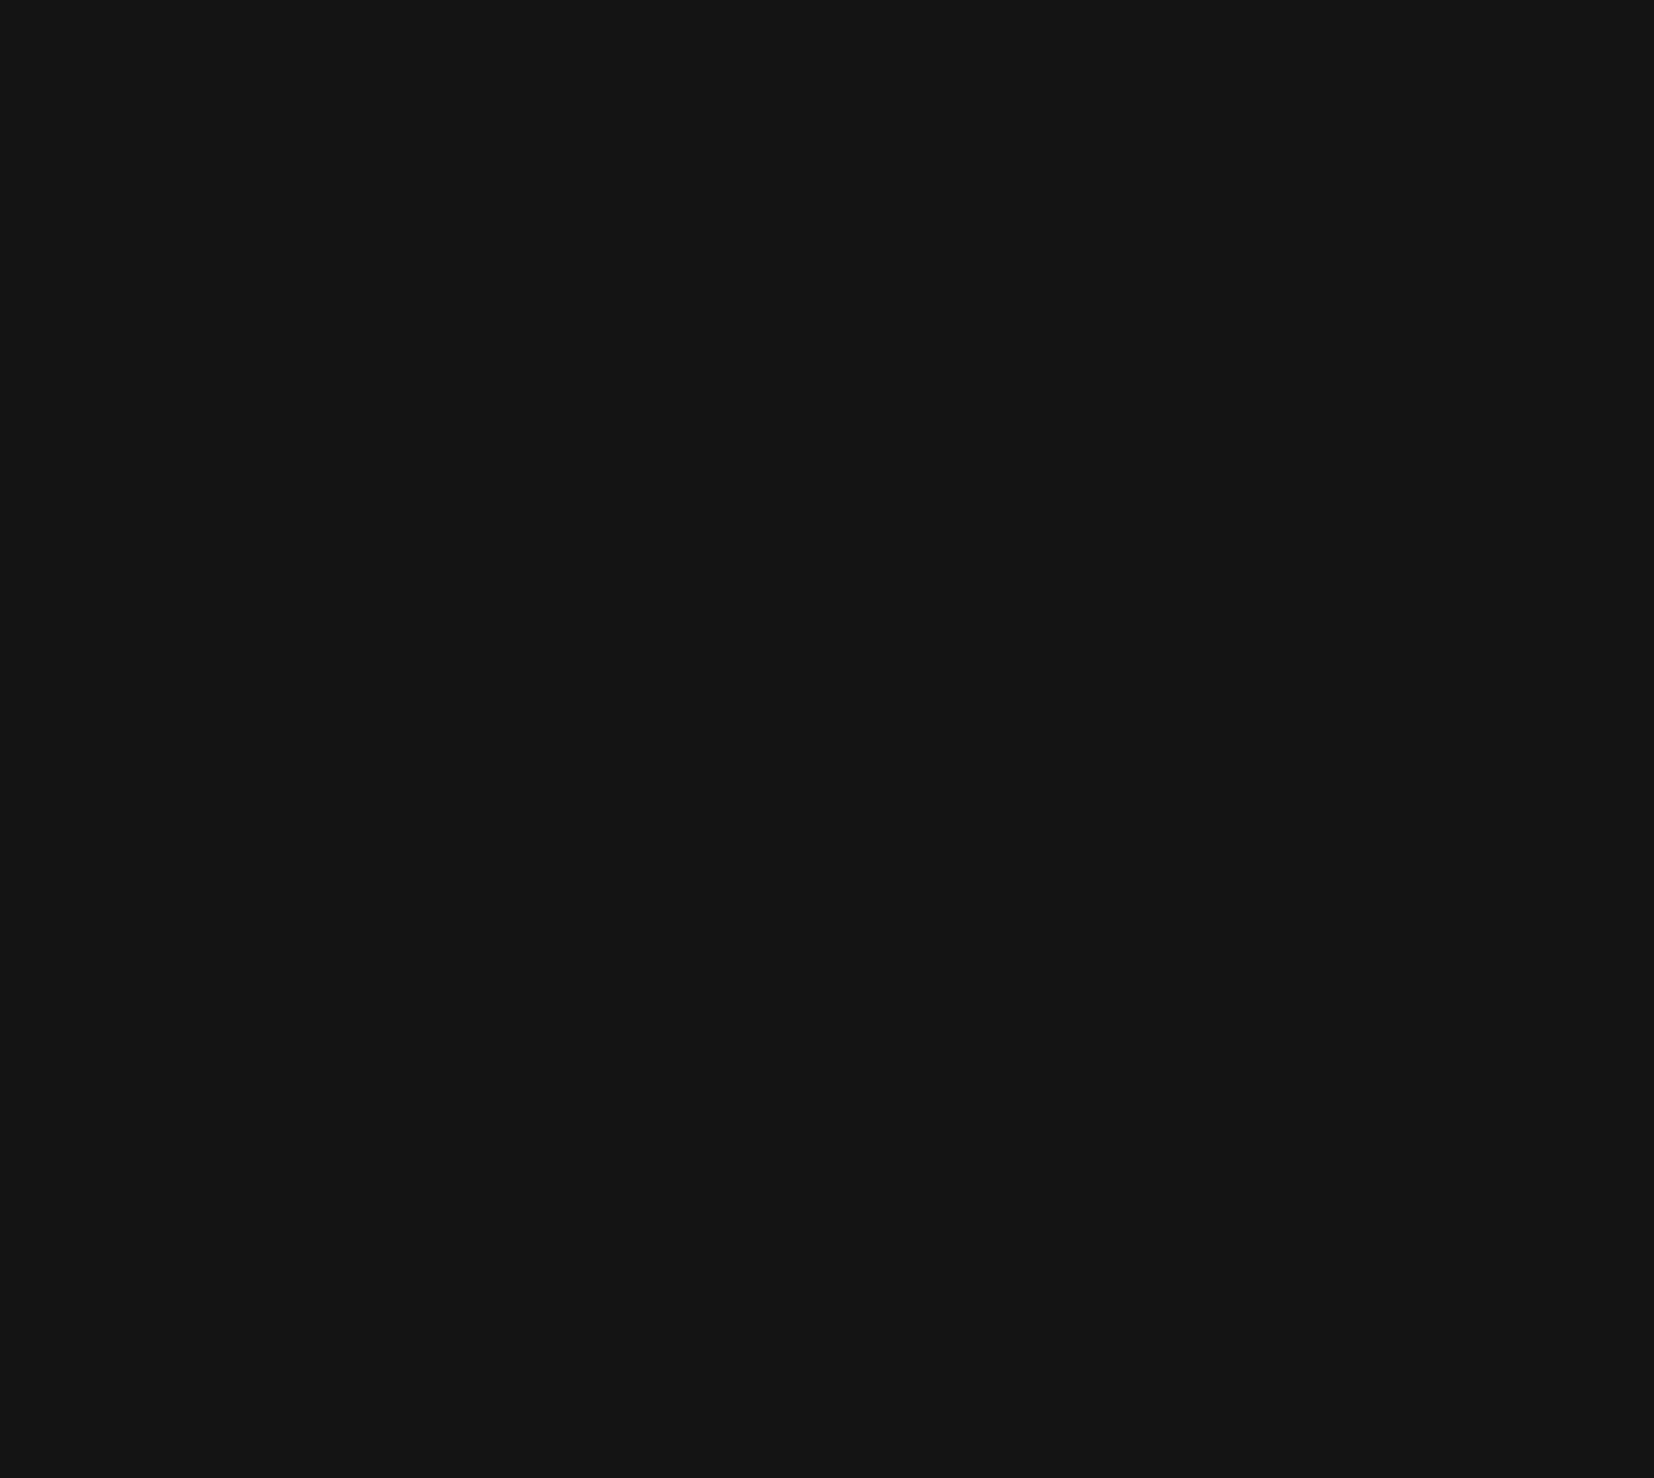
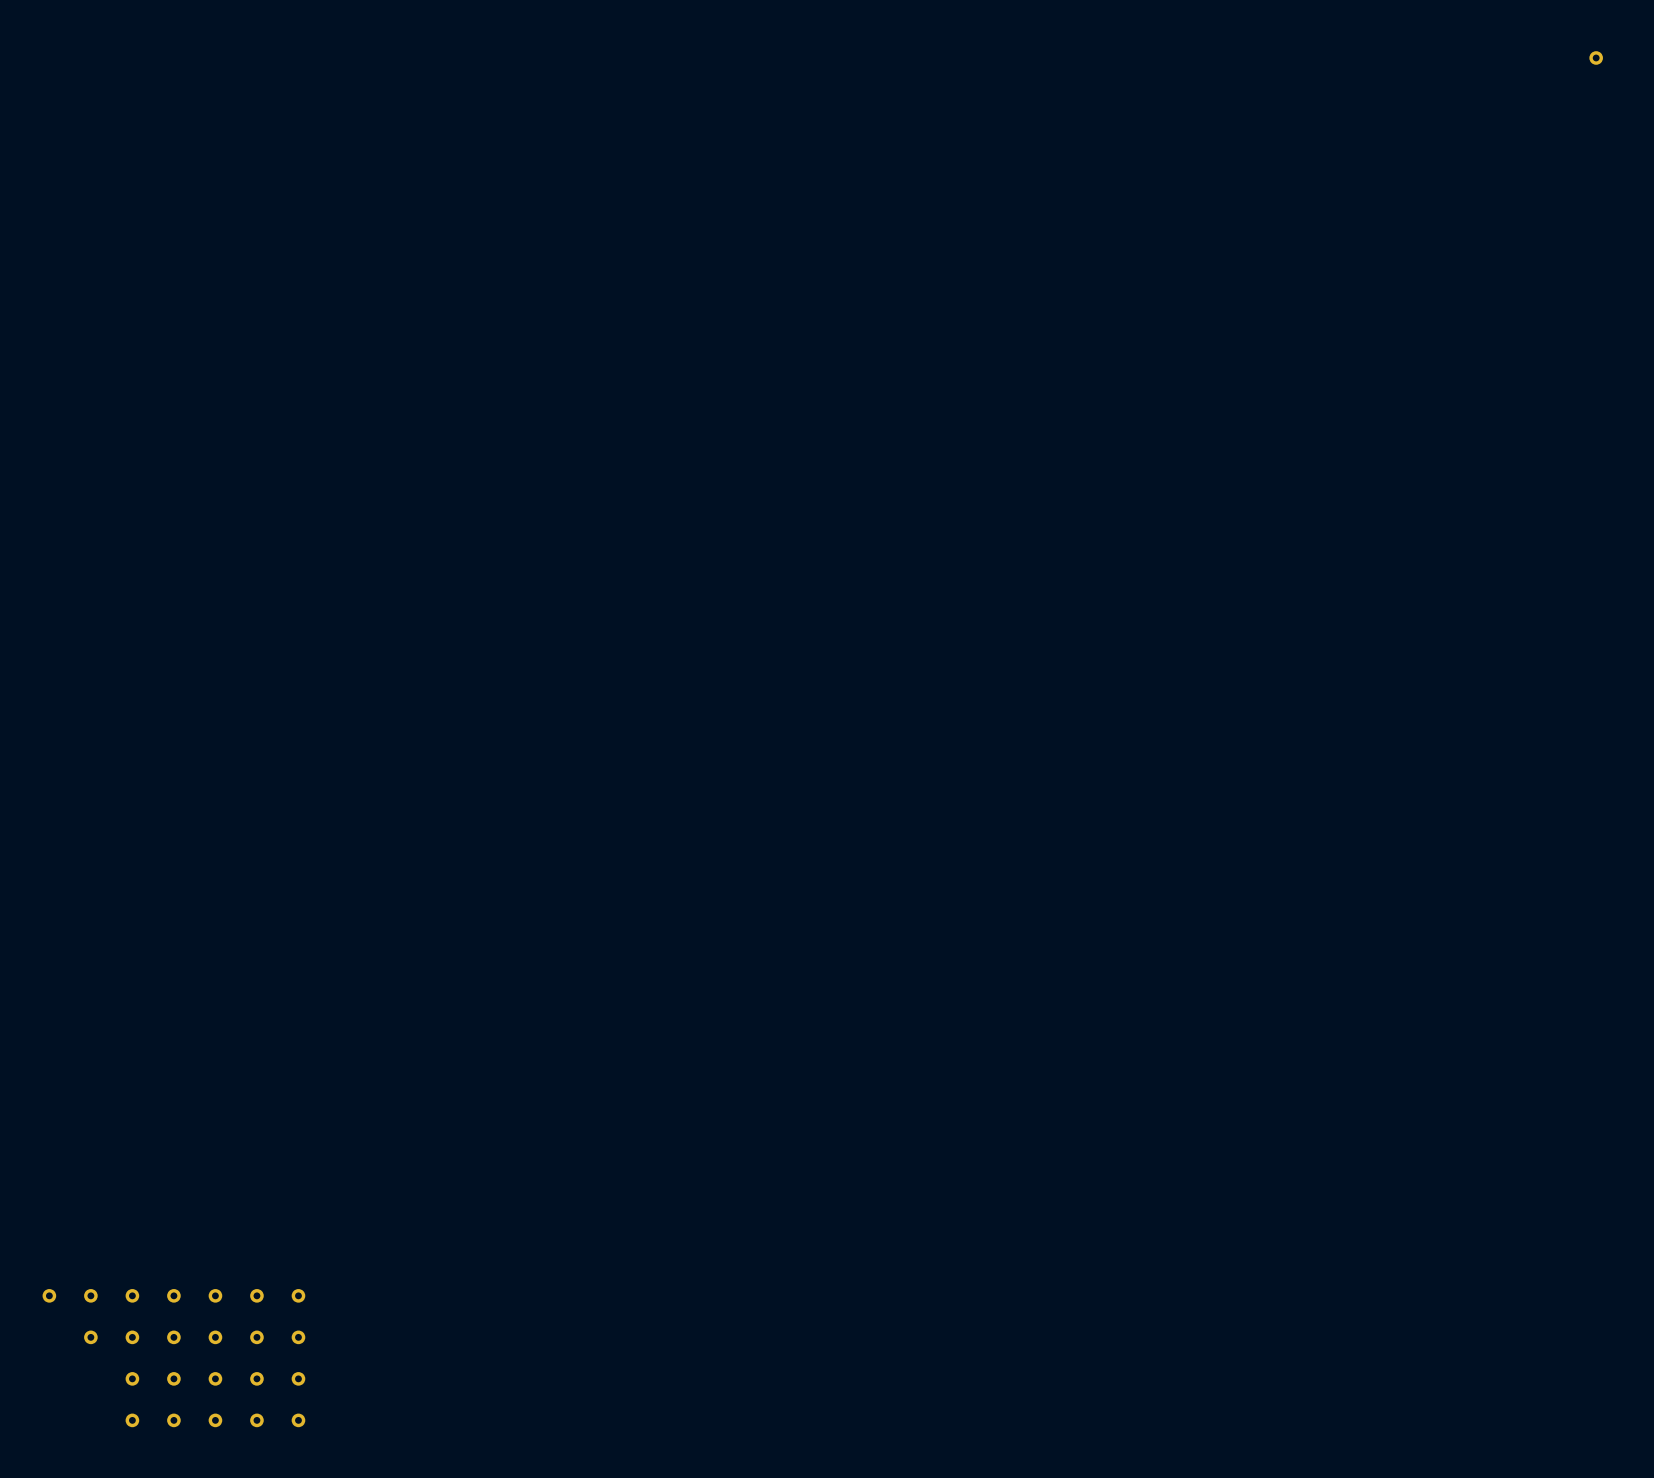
part: none -> (1596, 57)
part: none -> (49, 1295)
part: none -> (90, 1295)
part: none -> (132, 1295)
part: none -> (173, 1295)
part: none -> (215, 1295)
part: none -> (256, 1295)
part: none -> (298, 1295)
part: none -> (90, 1337)
part: none -> (132, 1337)
part: none -> (173, 1337)
part: none -> (215, 1337)
part: none -> (256, 1337)
part: none -> (298, 1337)
part: none -> (132, 1378)
part: none -> (173, 1378)
part: none -> (215, 1378)
part: none -> (256, 1378)
part: none -> (298, 1378)
part: none -> (132, 1420)
part: none -> (173, 1420)
part: none -> (215, 1420)
part: none -> (256, 1420)
part: none -> (298, 1420)

